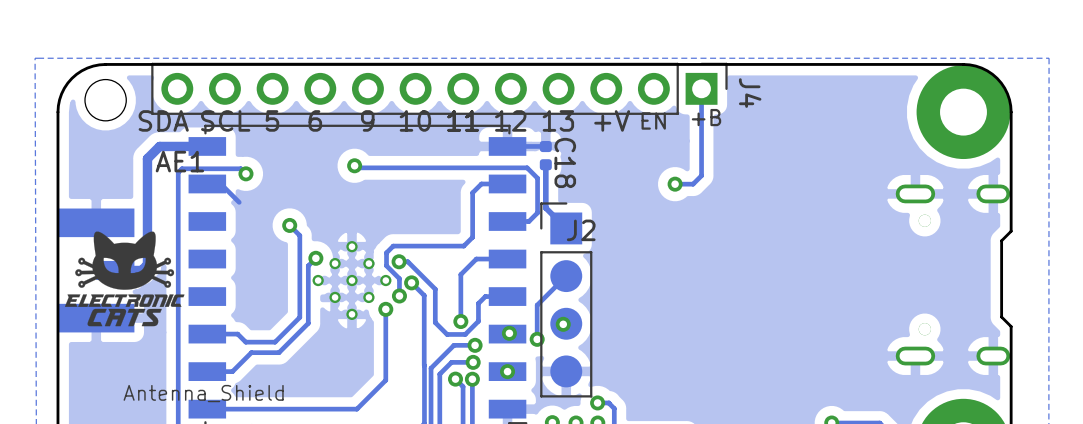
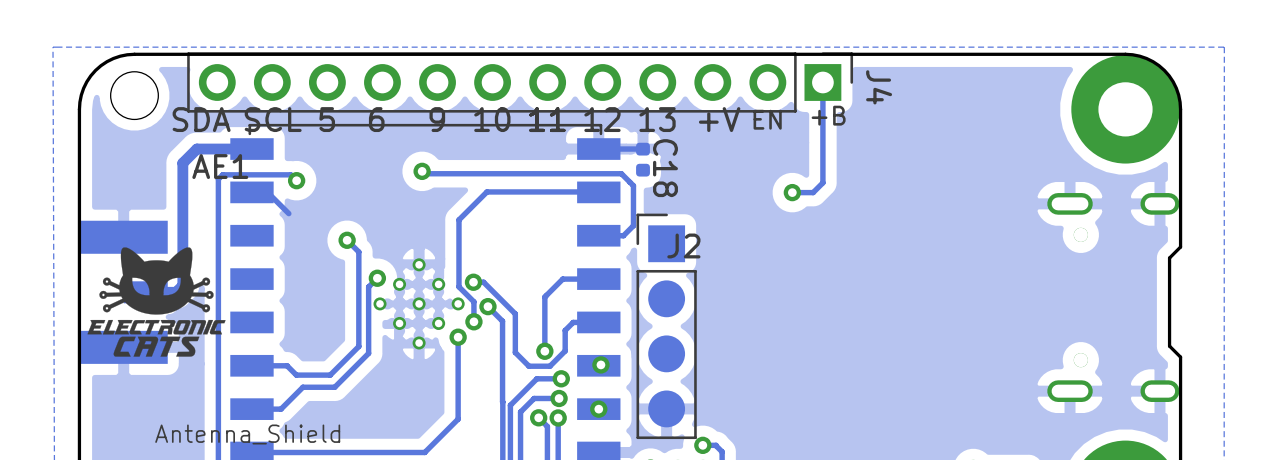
track: (545, 164) (545, 207) (566, 228) -> none
track: (507, 183) (481, 183) (472, 192) (472, 237) (463, 246) (393, 246) (386, 252) -> (598, 192) (486, 191) (458, 219) (458, 271)
track: (566, 276) (537, 305) (537, 339) -> none
via: (563, 324) -> none
via: (537, 339) -> none

